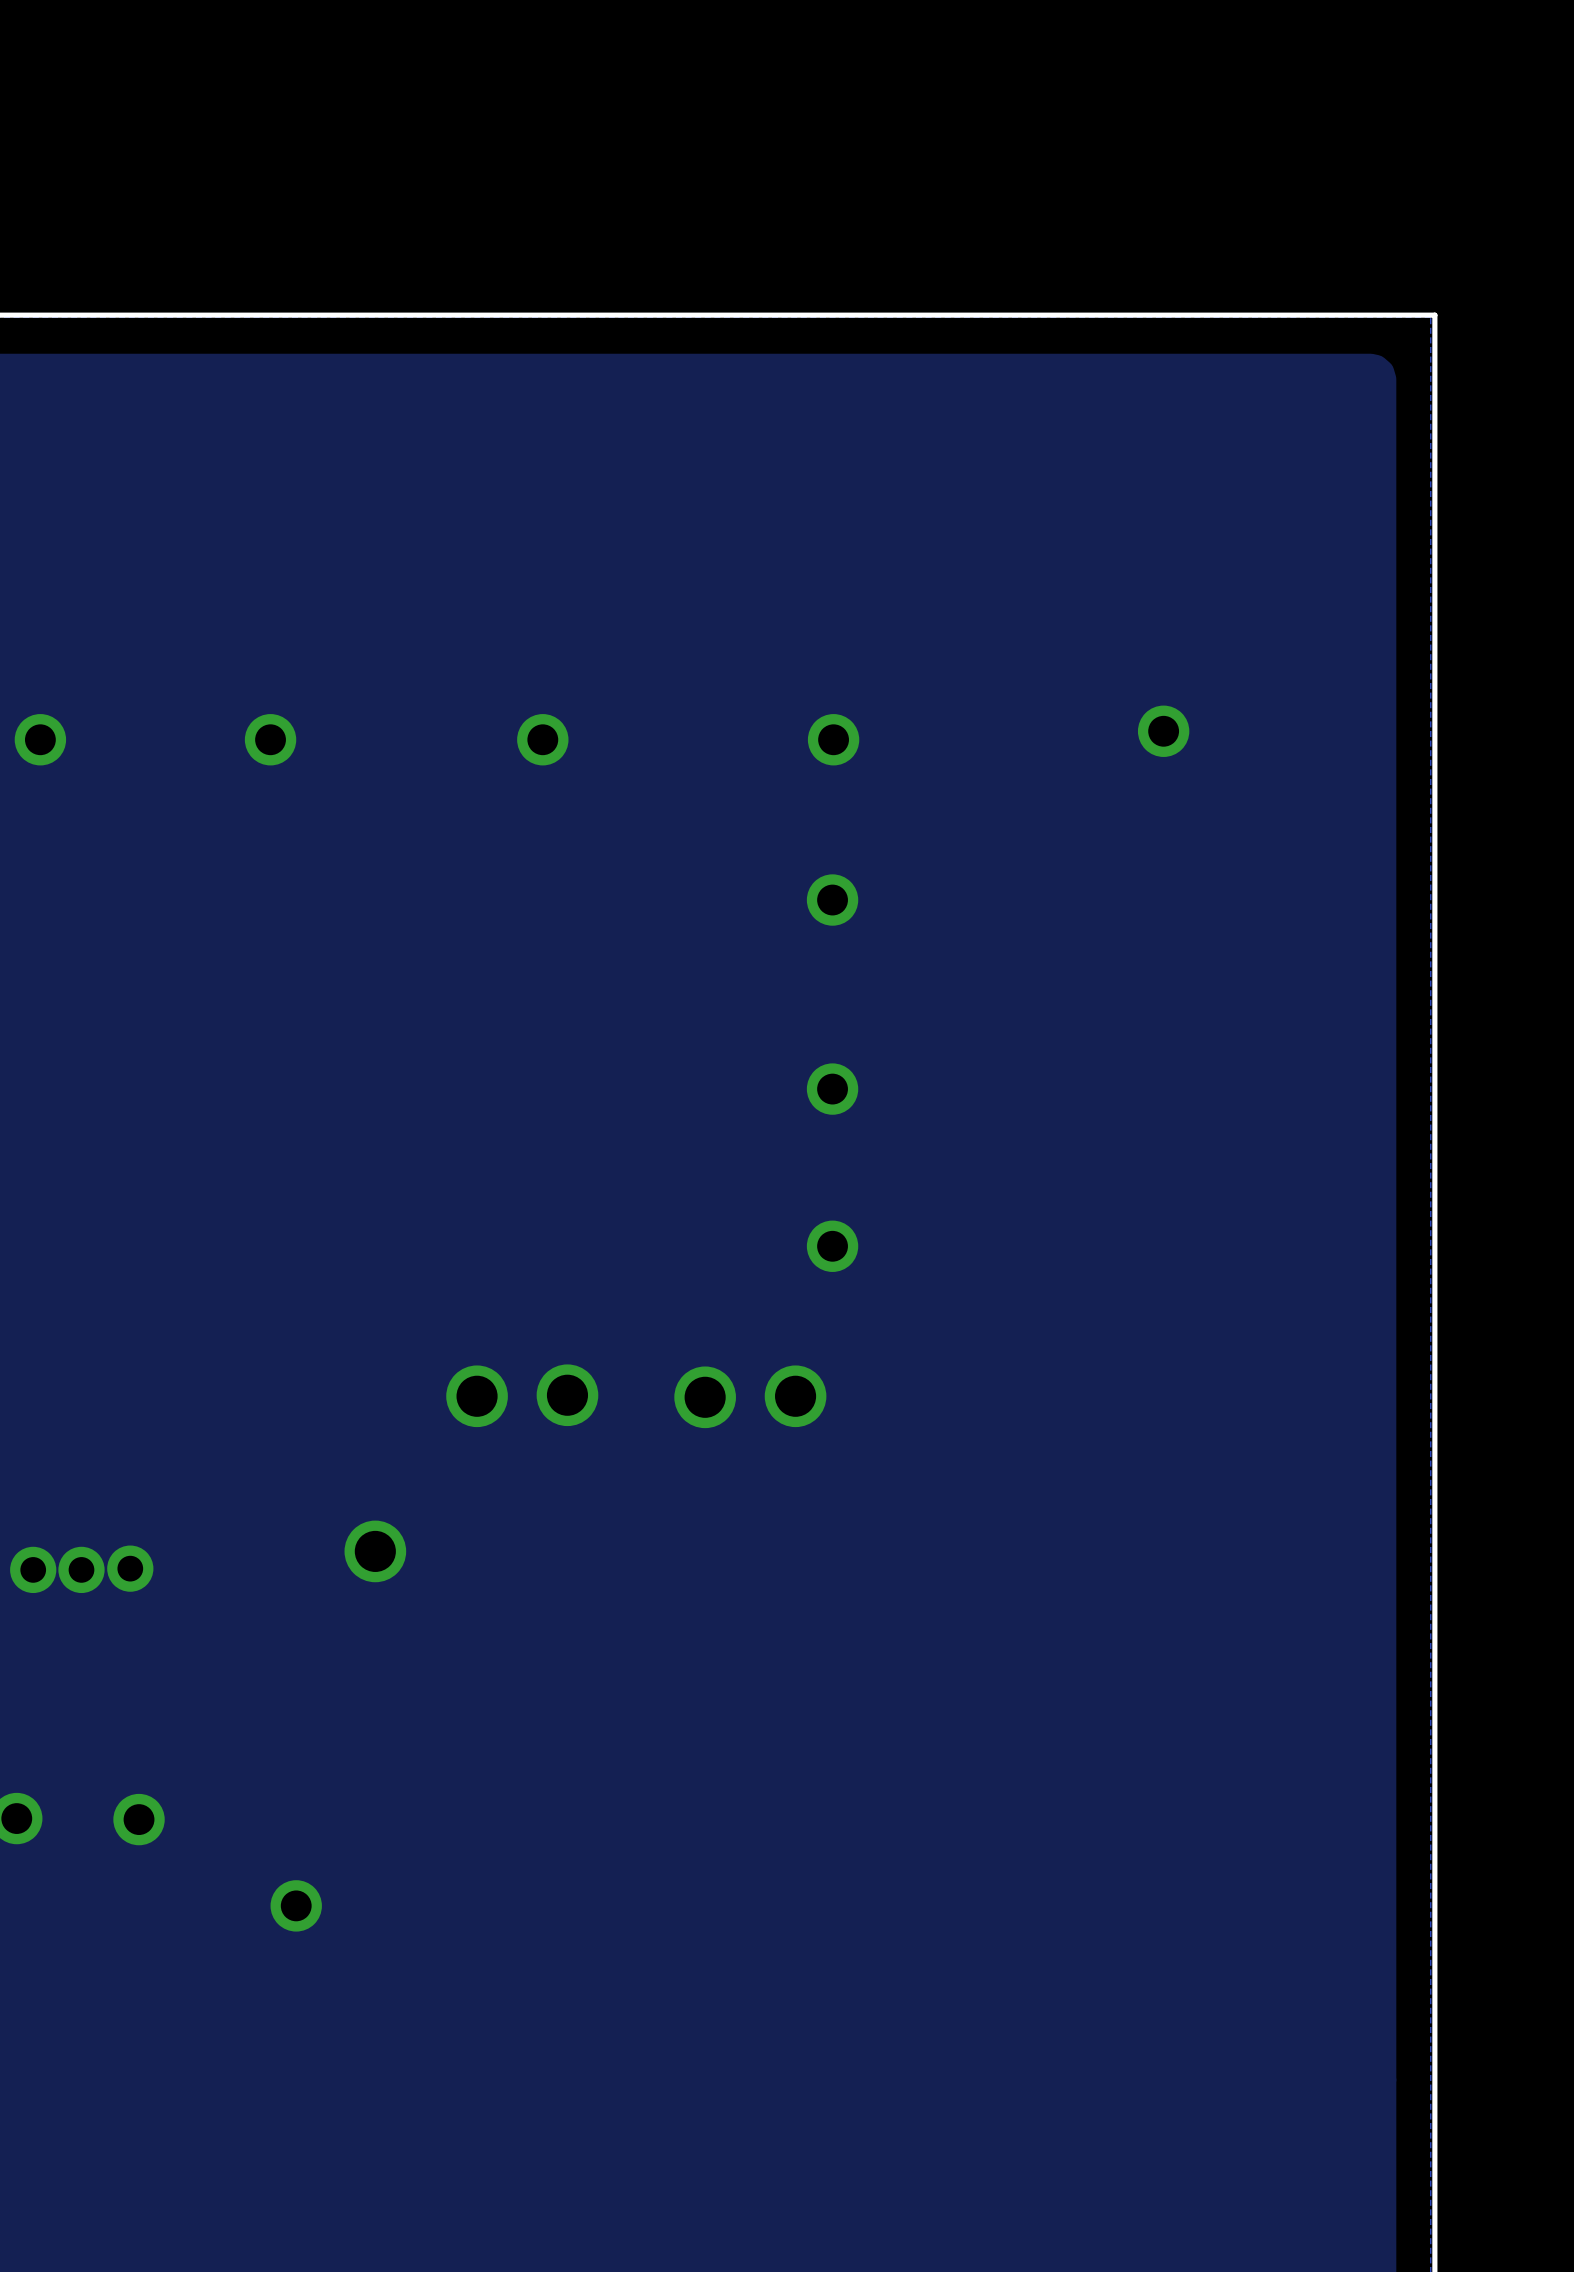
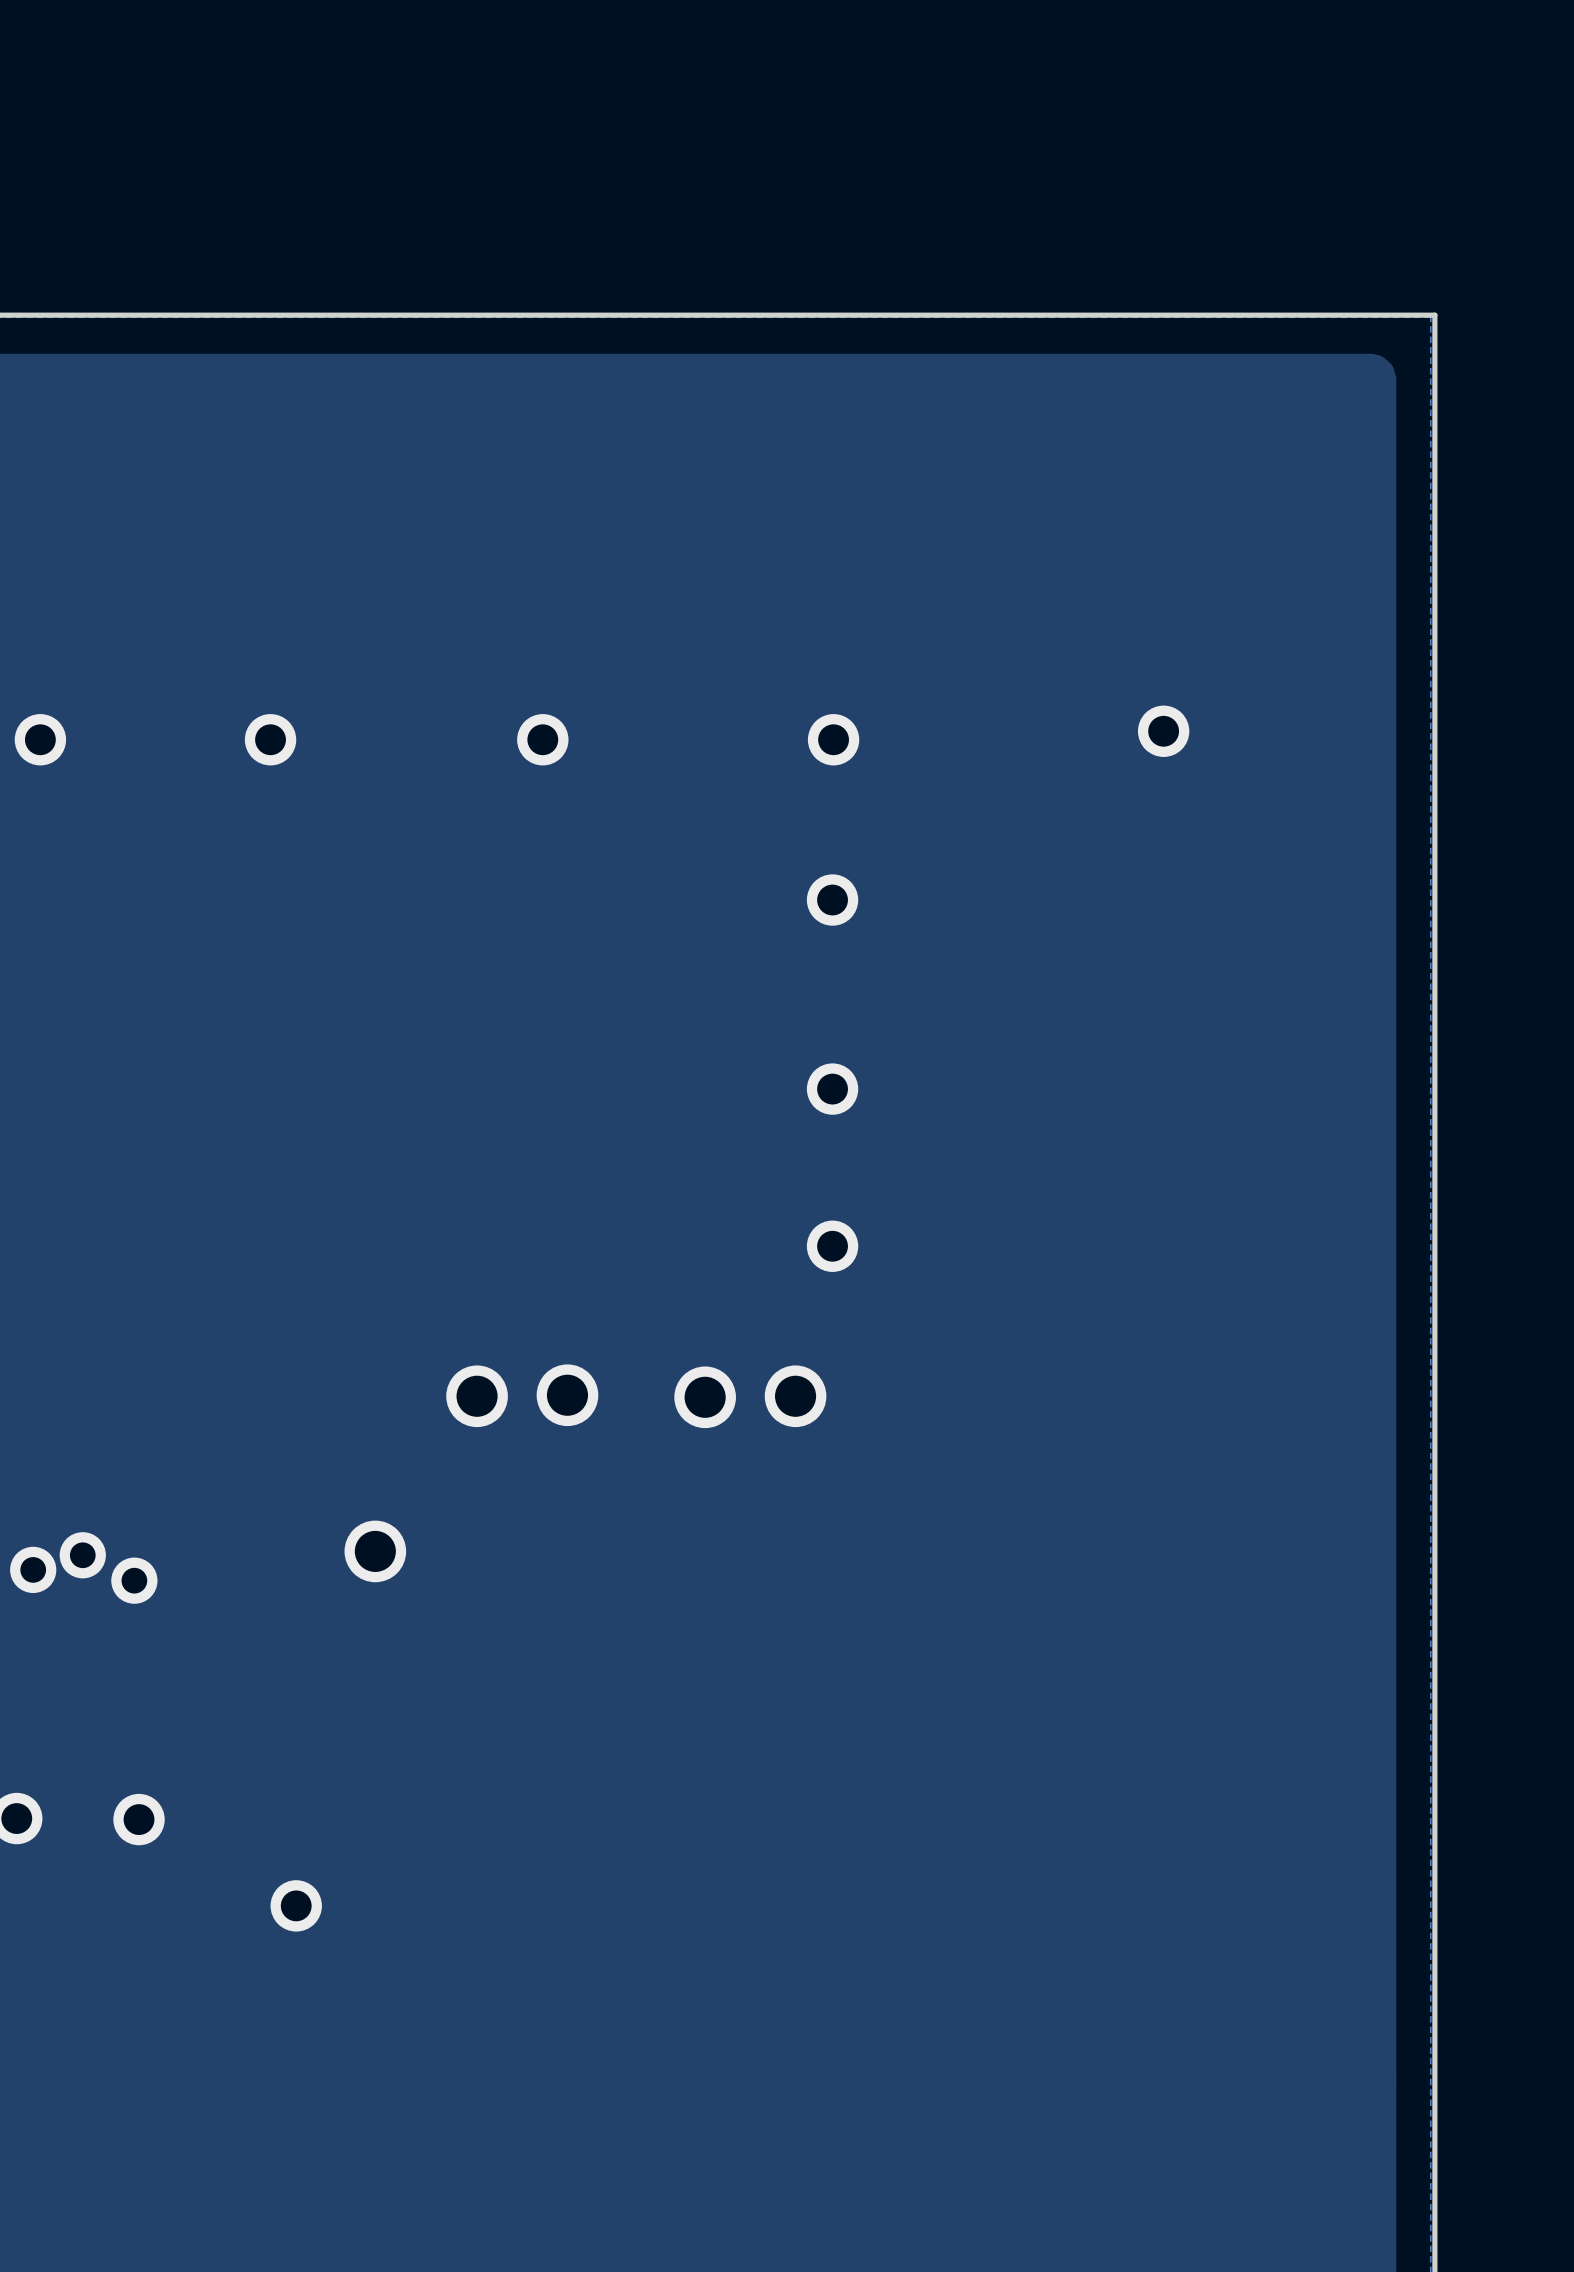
via position: (130, 1568) -> (134, 1580)
via position: (81, 1569) -> (82, 1555)

